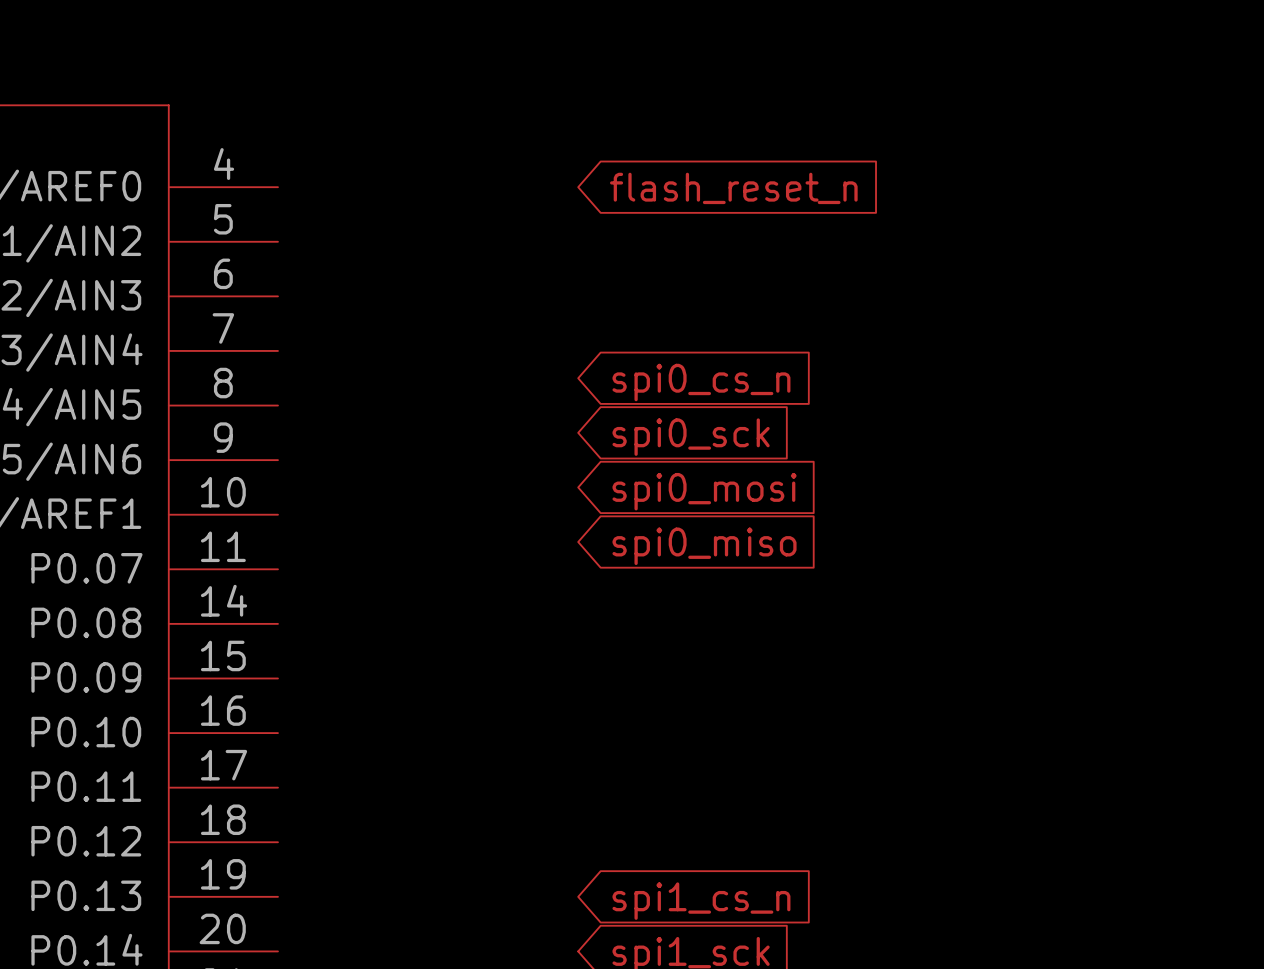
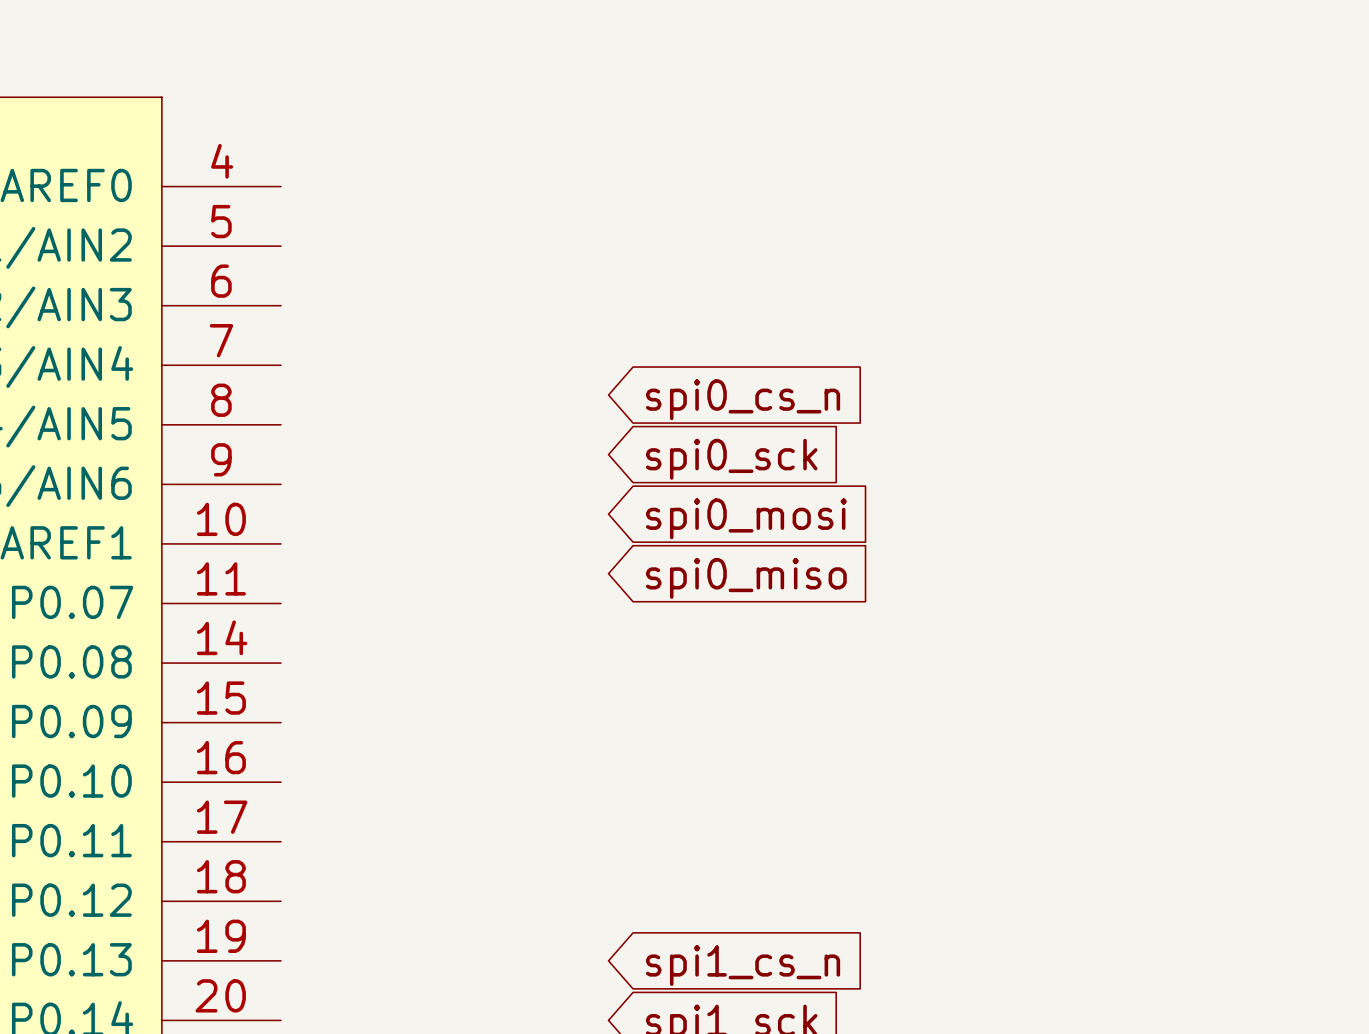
global label: flash_reset_n (733, 188) -> none

